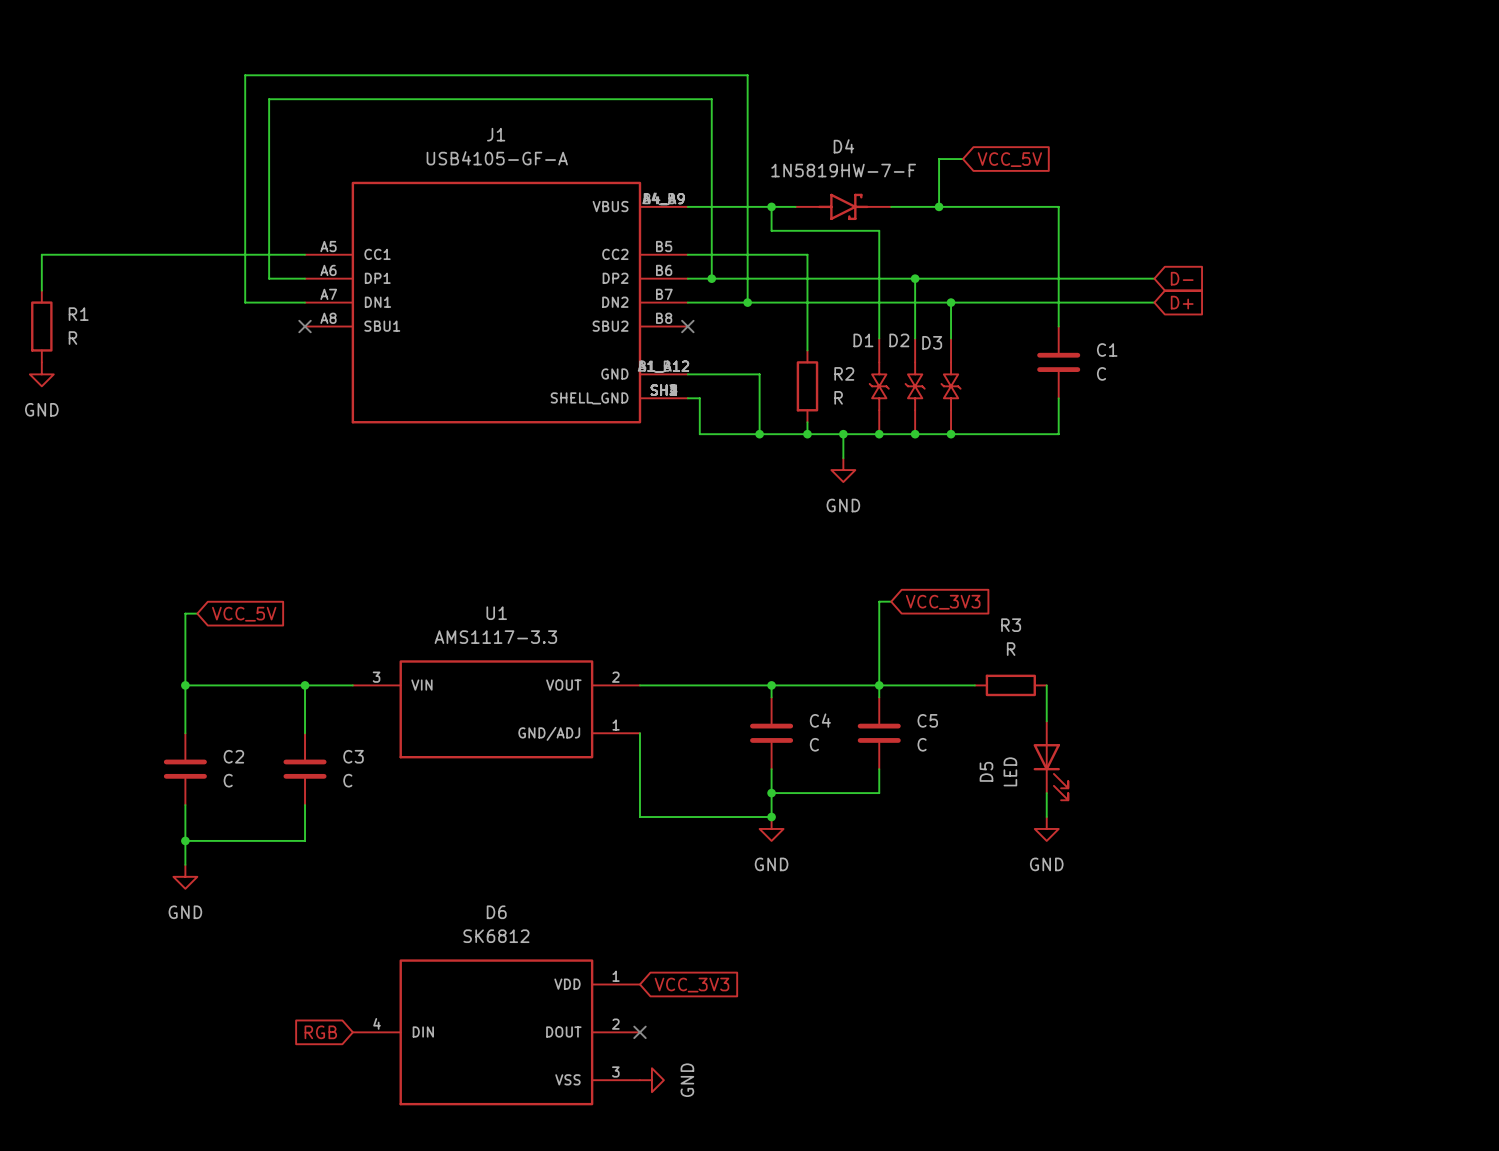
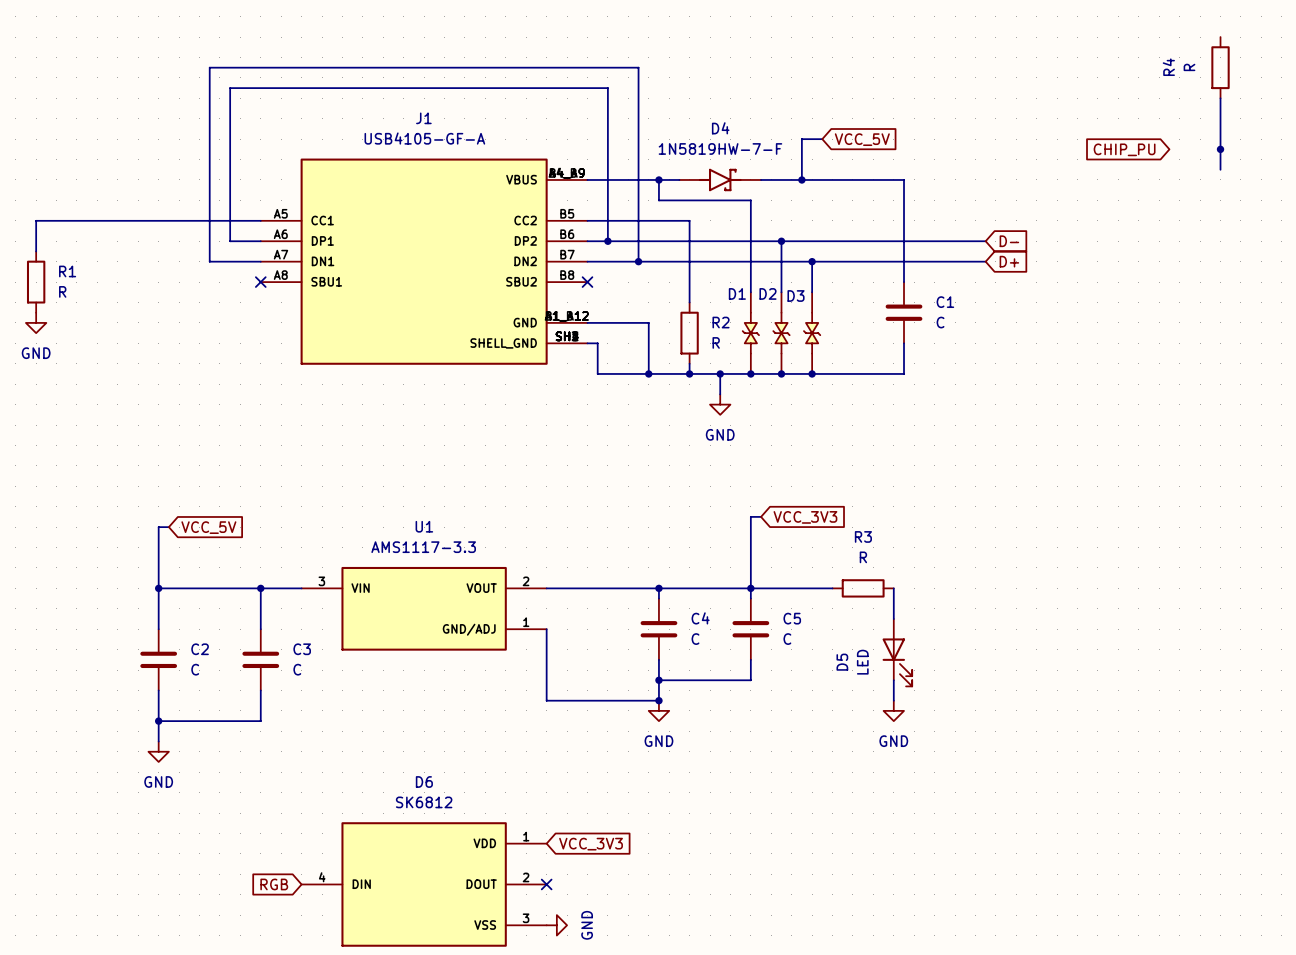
R4: none -> R (1220, 67)
wire: none -> (1220, 98) (1220, 169)
junction: none -> (1220, 149)
global label: none -> CHIP_PU (1124, 149)

